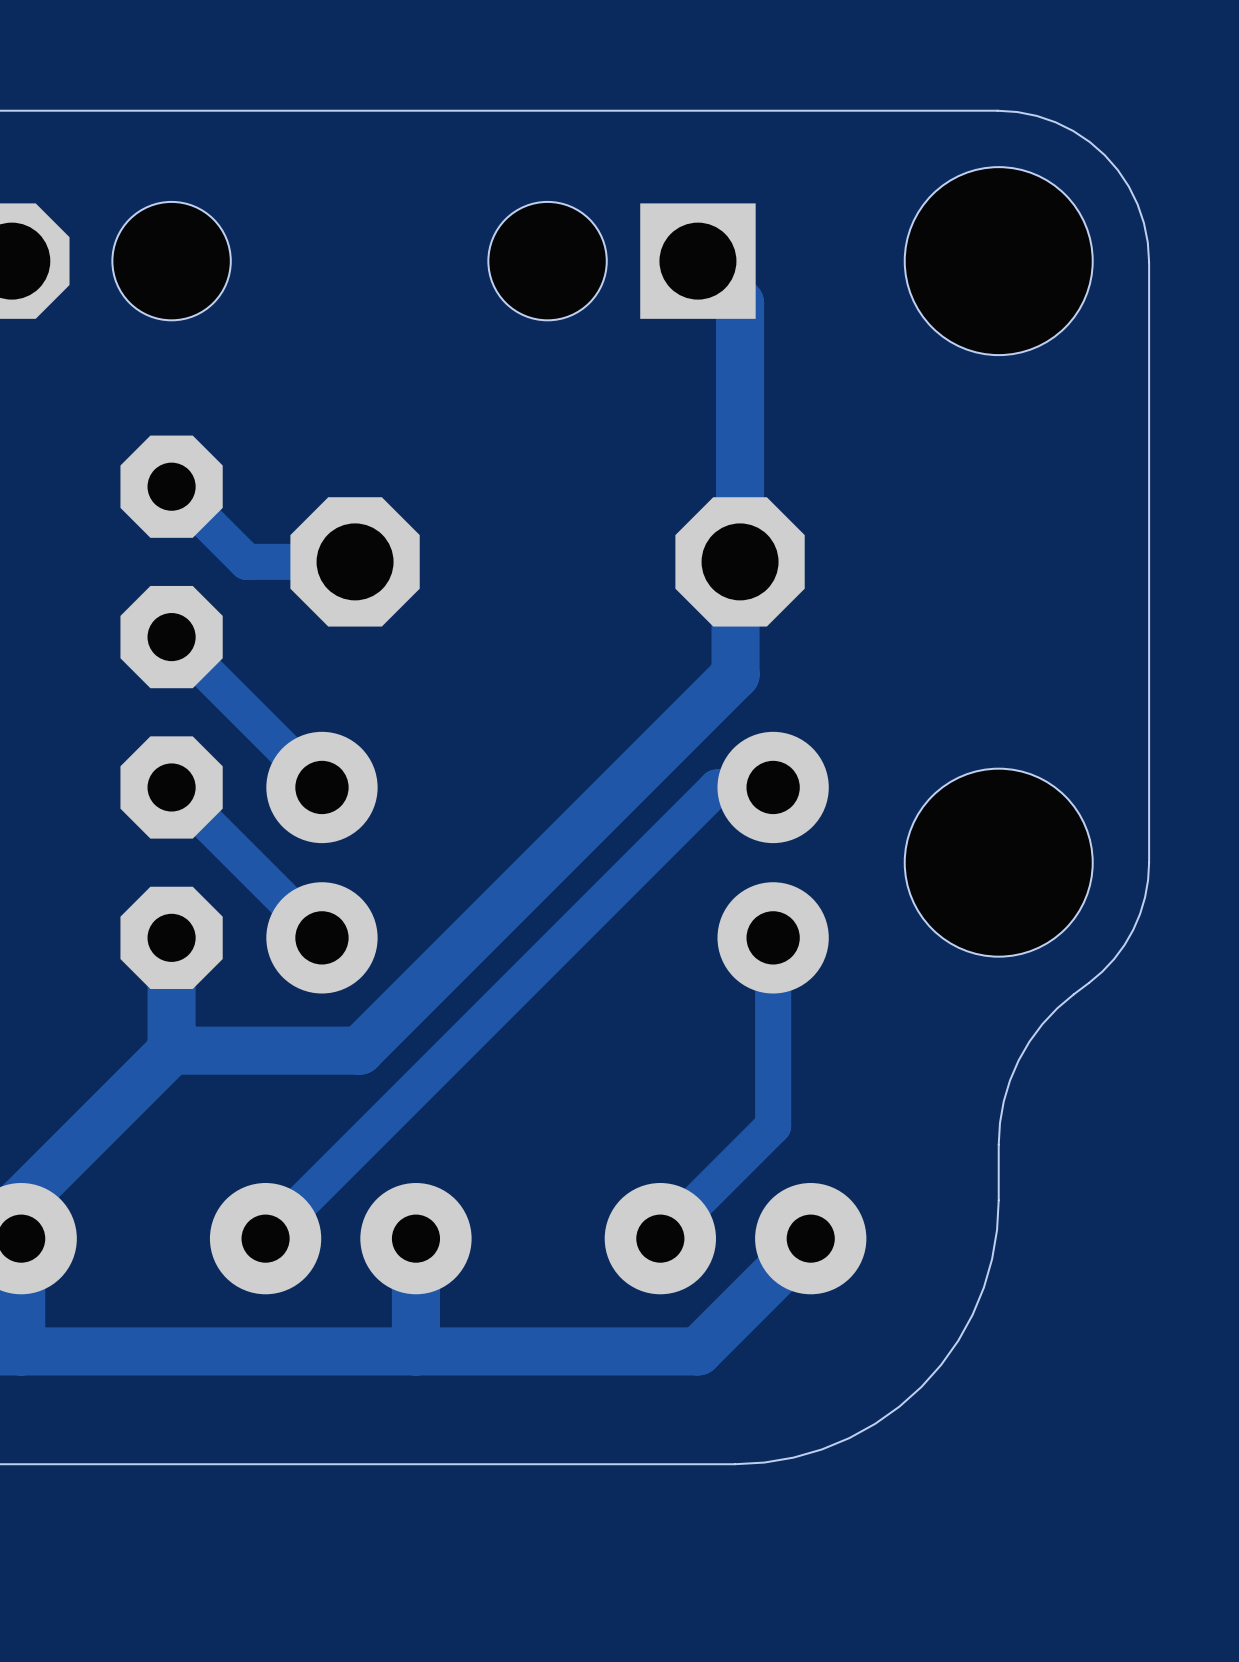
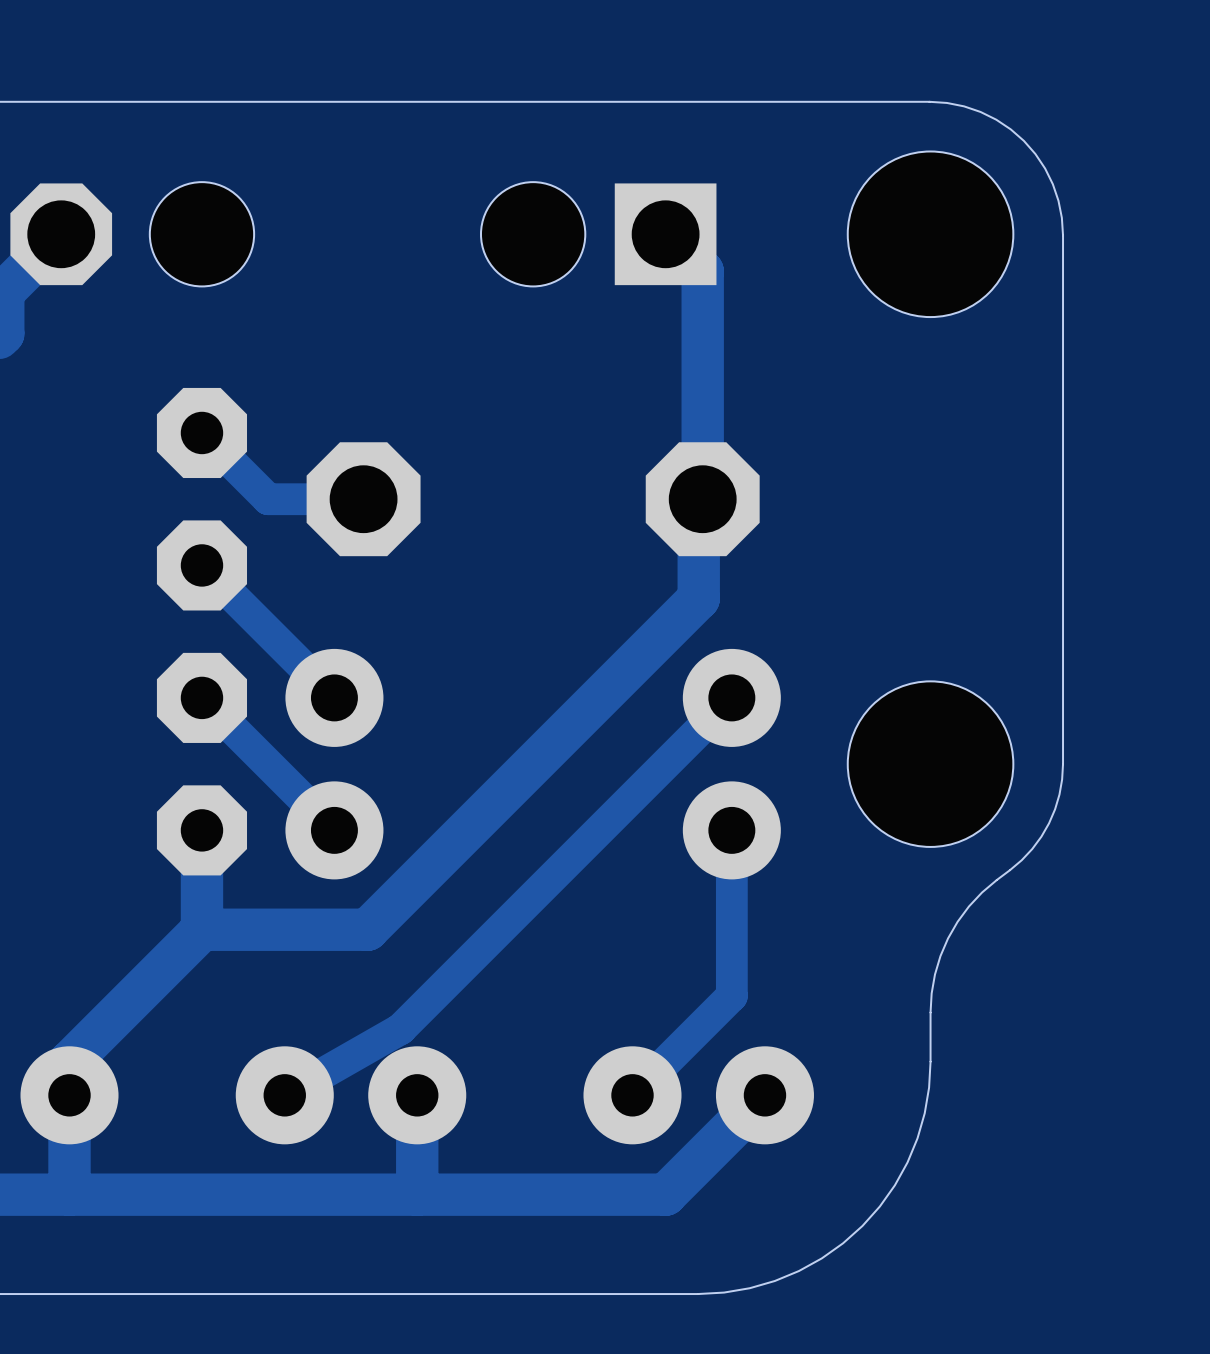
track: (773, 787) (716, 787) (265, 1238) -> (731, 697) (400, 1029) (284, 1095)

